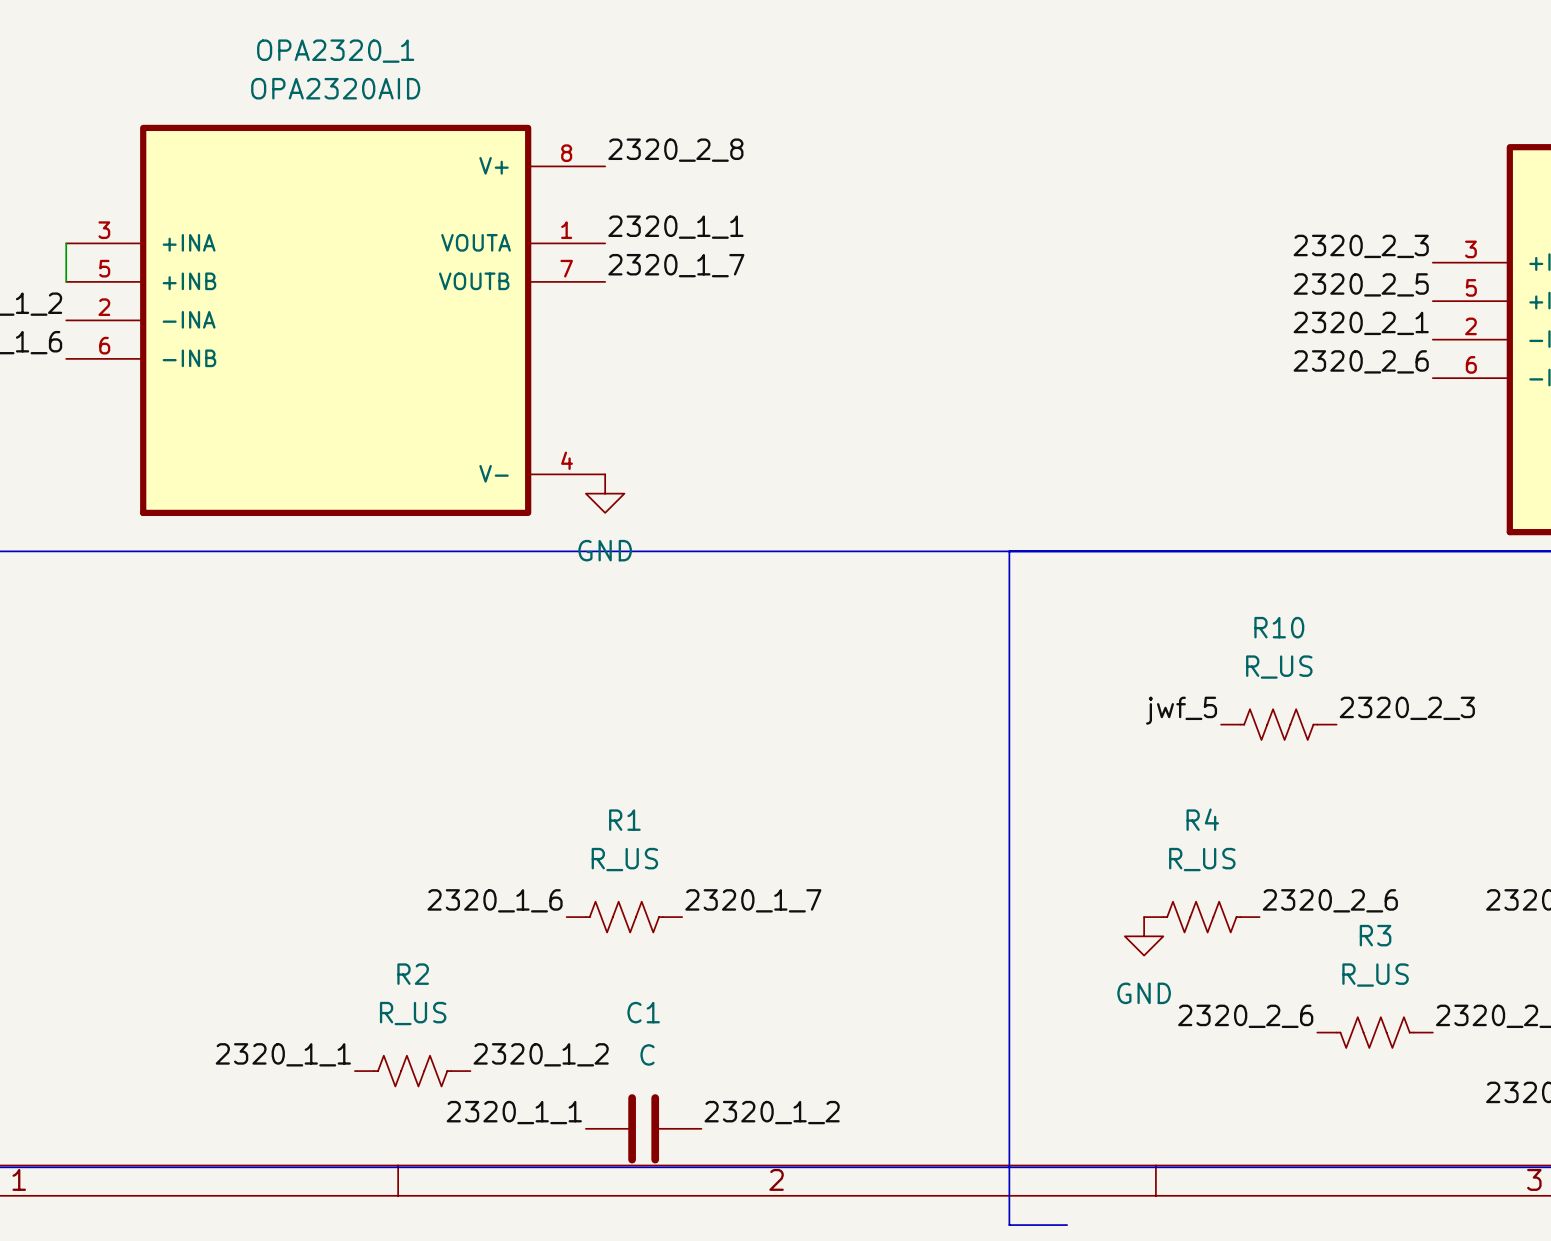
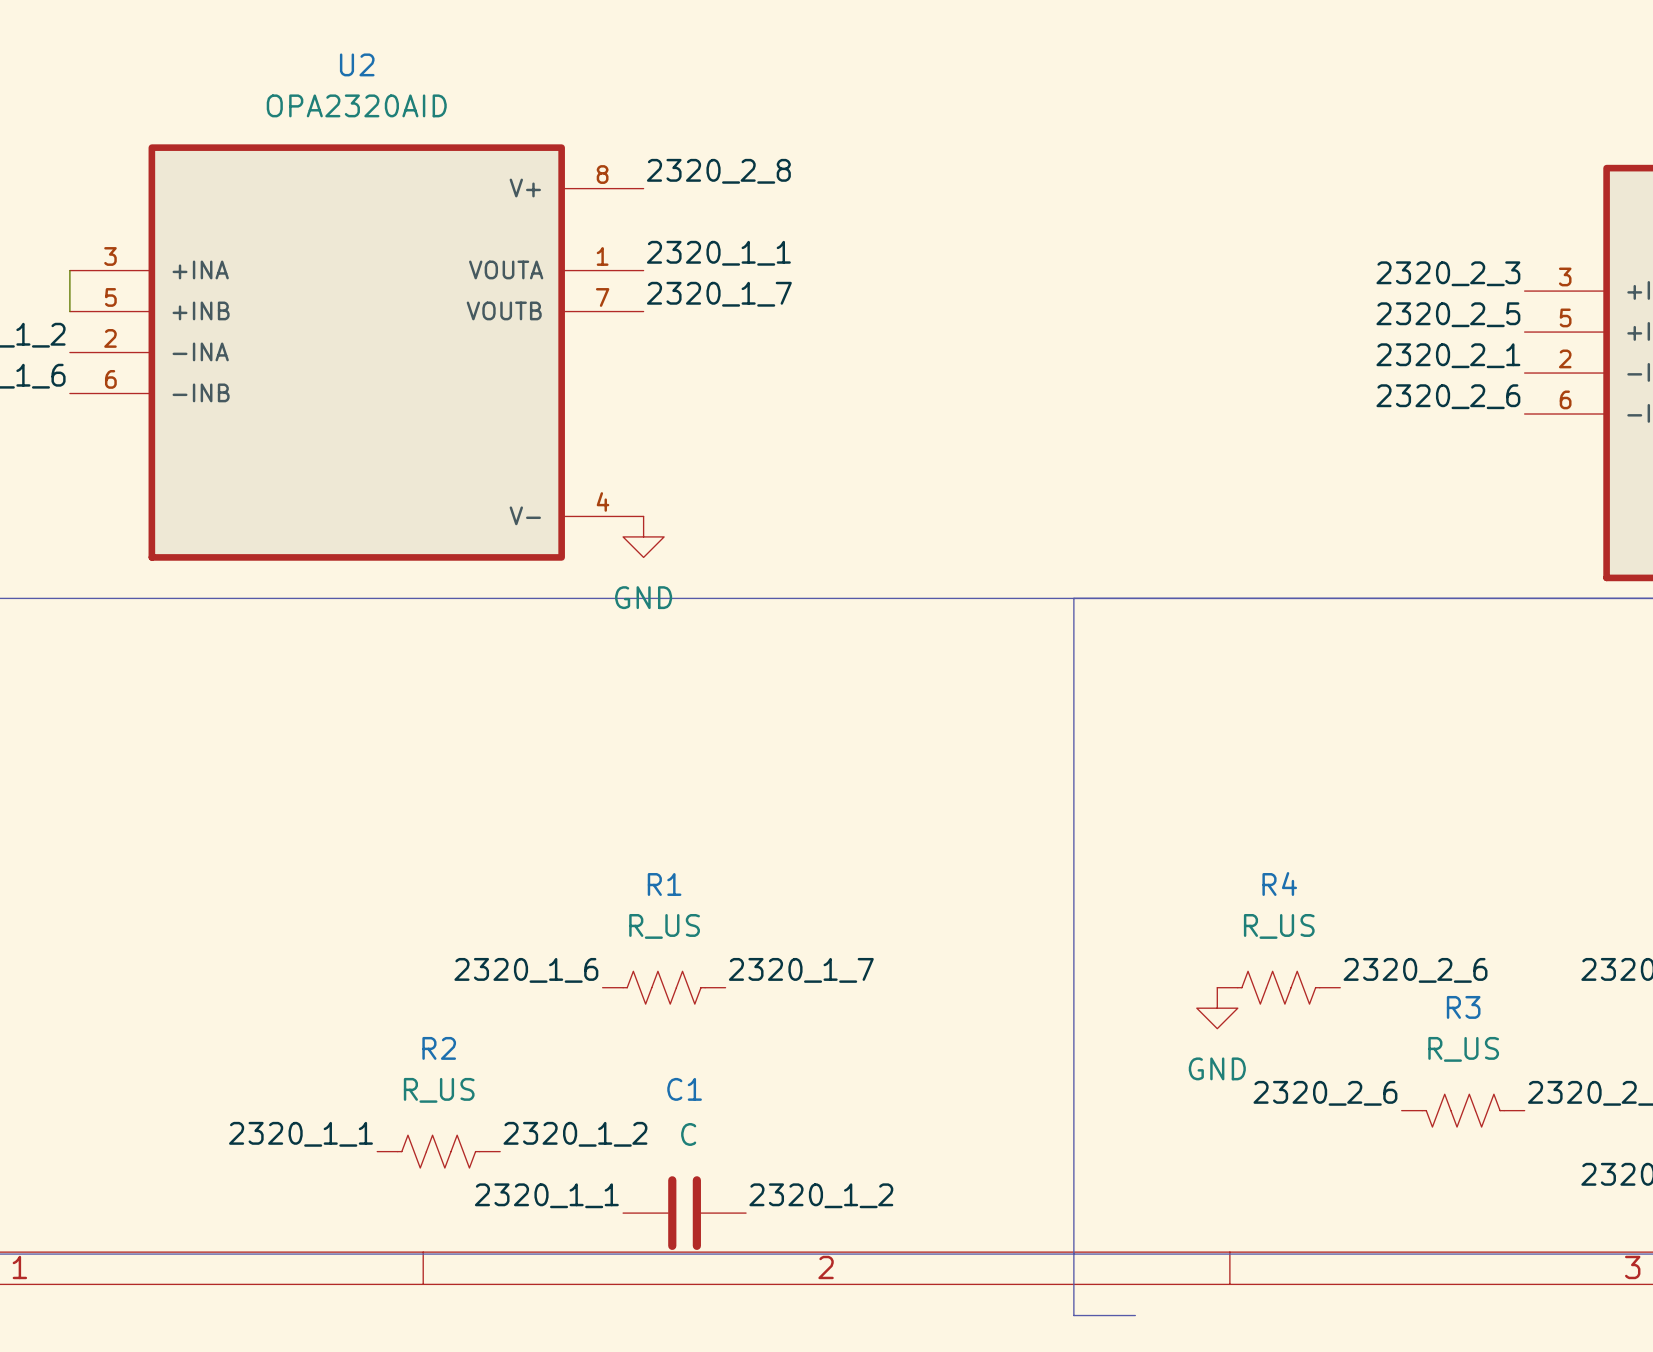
OPA2320_1 name: OPA2320_1 (335, 51) -> U2 (357, 64)
label: 2320_2_3 (1407, 708) -> none
label: jwf_5 (1181, 710) -> none
R10: R_US (1278, 724) -> none

